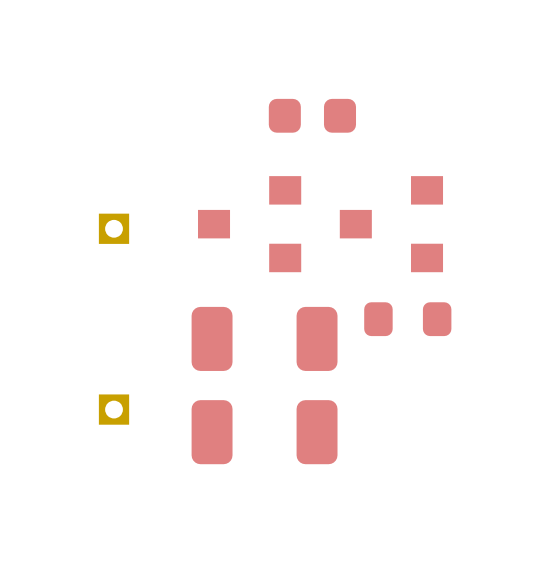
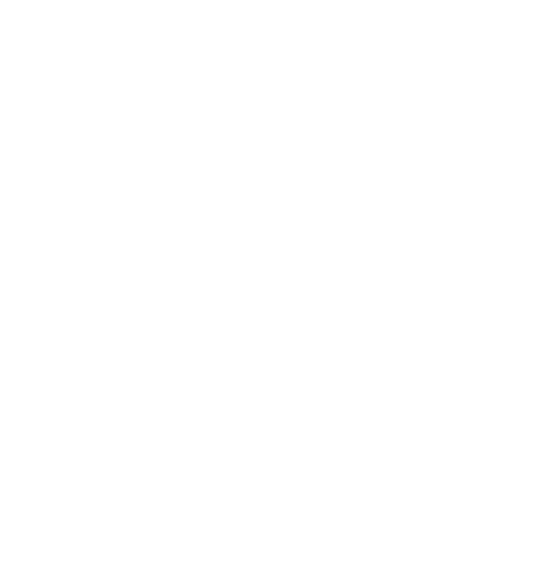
part: (312, 115) -> none
part: (249, 224) -> none
part: (391, 224) -> none
part: (114, 228) -> none
part: (407, 319) -> none
part: (264, 338) -> none
part: (114, 409) -> none
part: (264, 432) -> none

